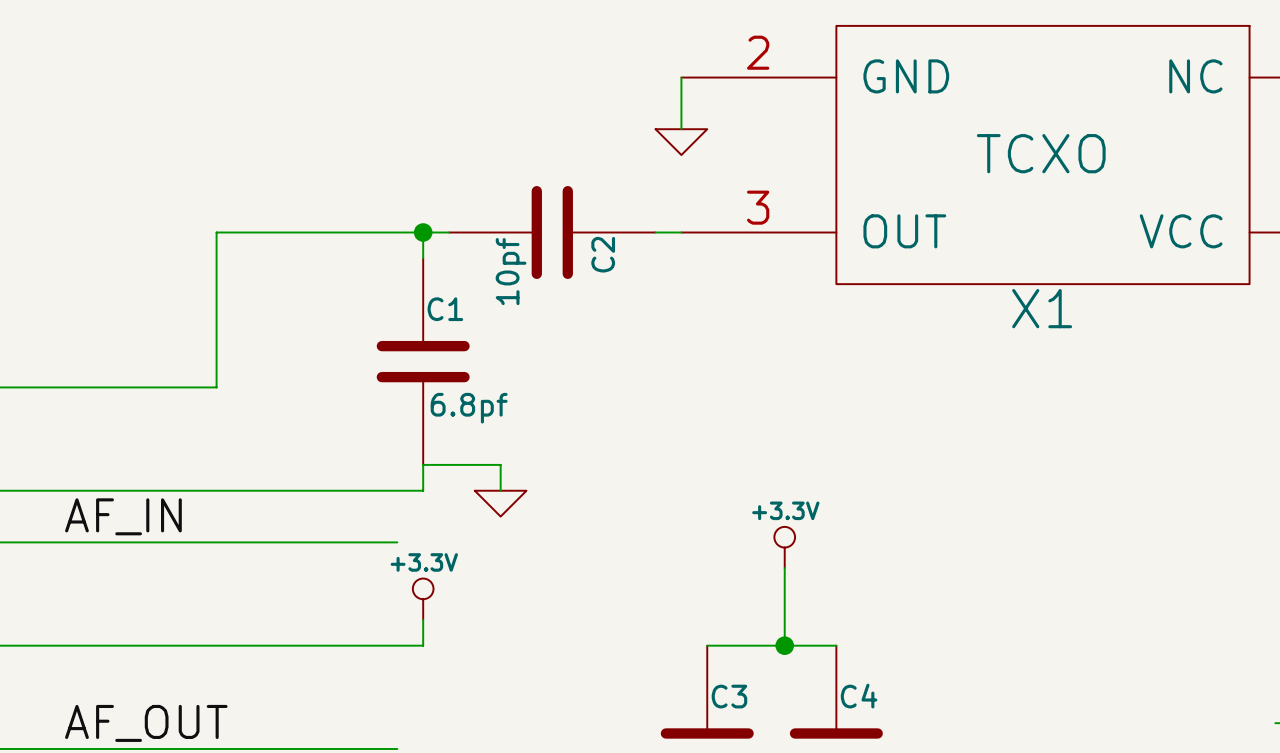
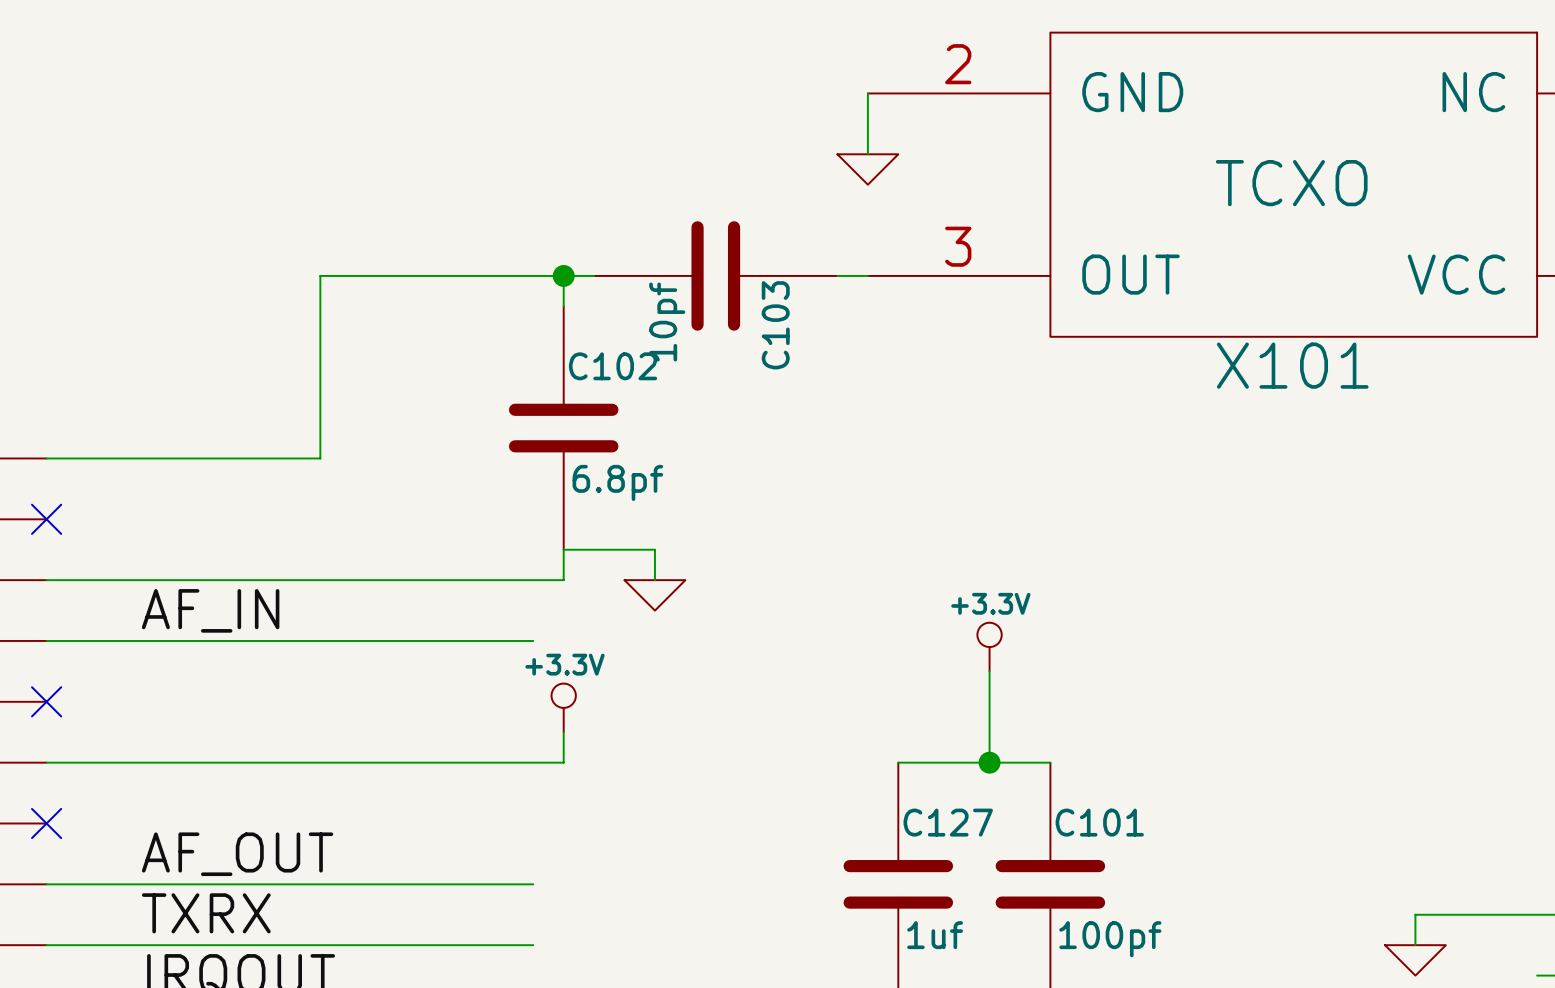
C2 name: C2 (603, 254) -> C103 (775, 325)
X1 name: X1 (1042, 308) -> X101 (1292, 365)
C1 name: C1 (445, 309) -> C102 (613, 366)
C3 name: C3 (729, 696) -> C127 (948, 822)
C4 name: C4 (859, 696) -> C101 (1099, 822)

